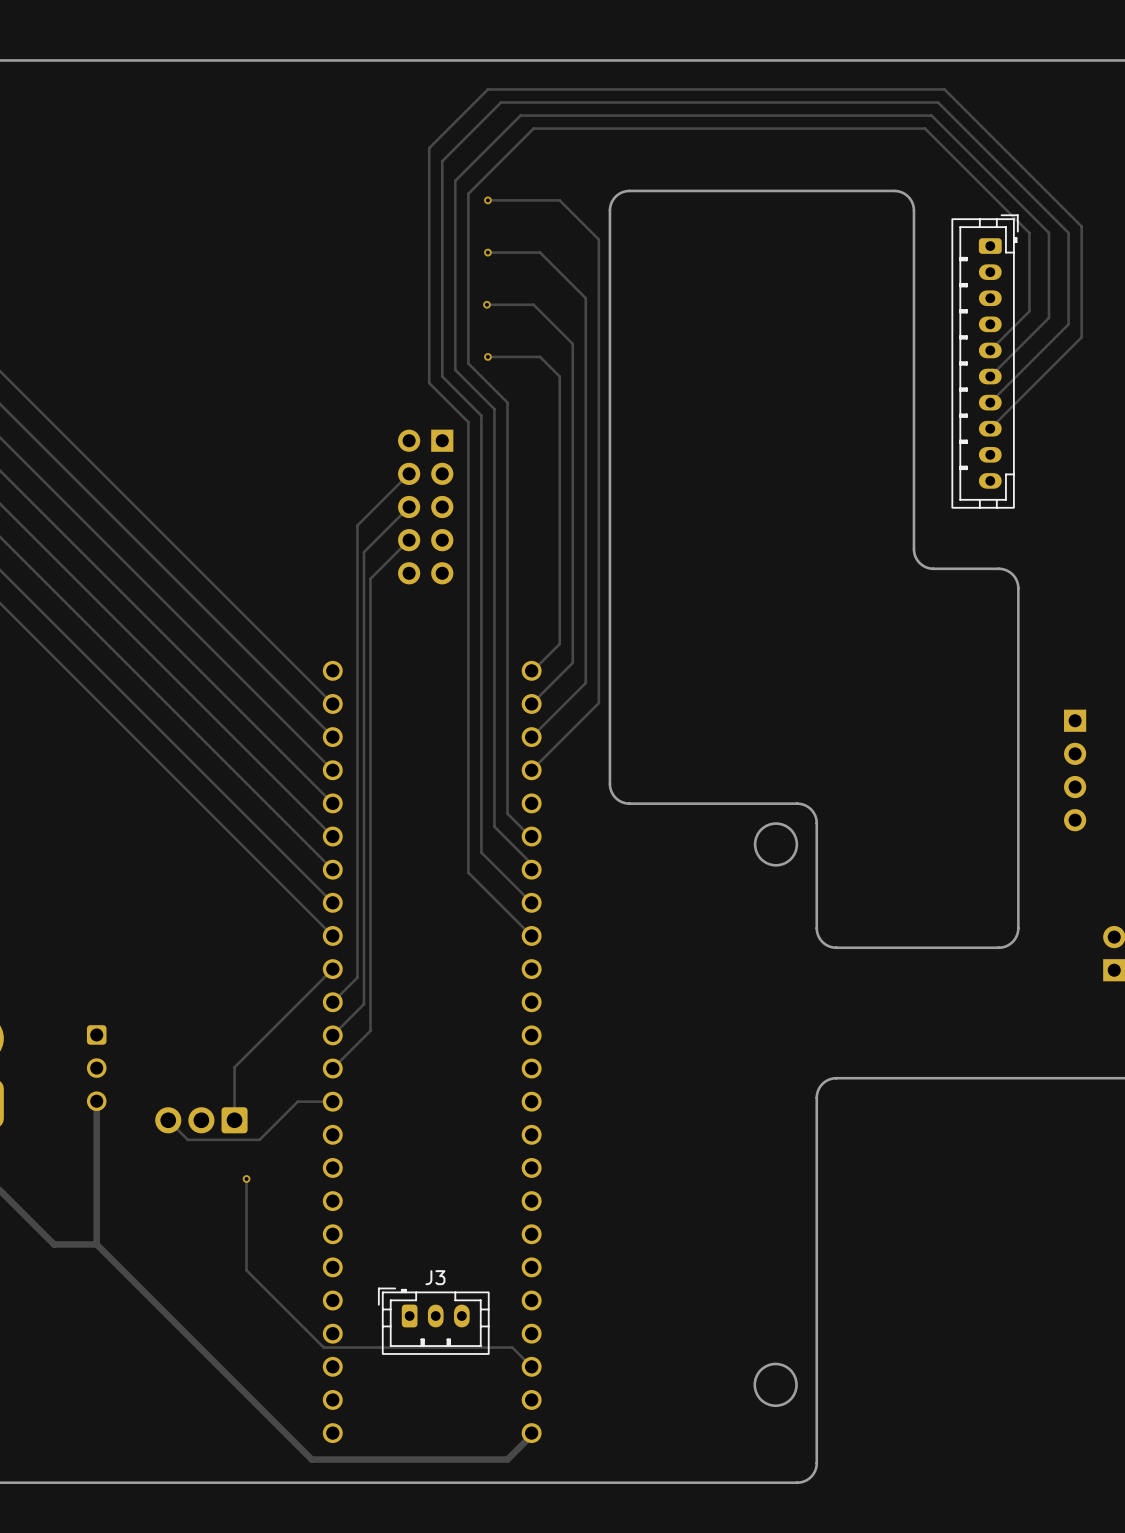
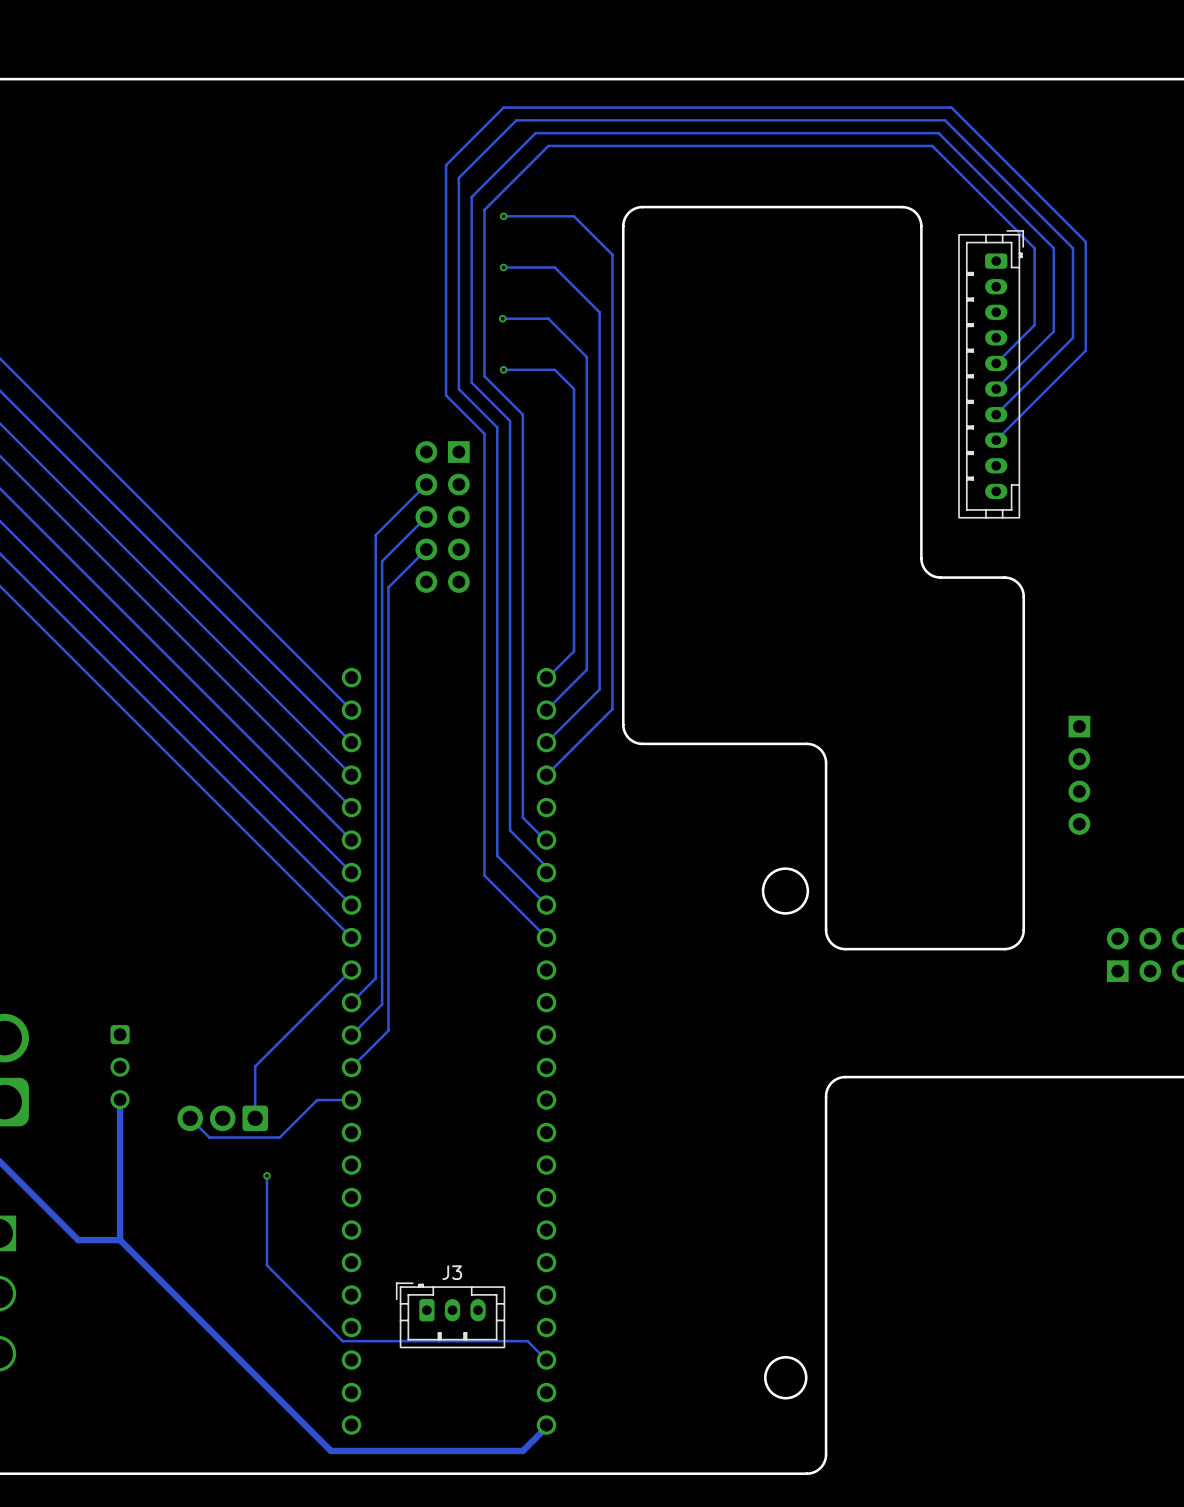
board edge: (609, 718) (610, 786) (612, 793) (619, 801) (629, 803) (799, 803) (812, 811) (816, 823) -> (623, 724) (628, 738) (640, 743) (806, 743) (815, 745) (821, 751) (825, 760) (826, 827)
round board edge: [753, 822, 799, 867] -> none
round board edge: none -> [761, 867, 810, 915]

